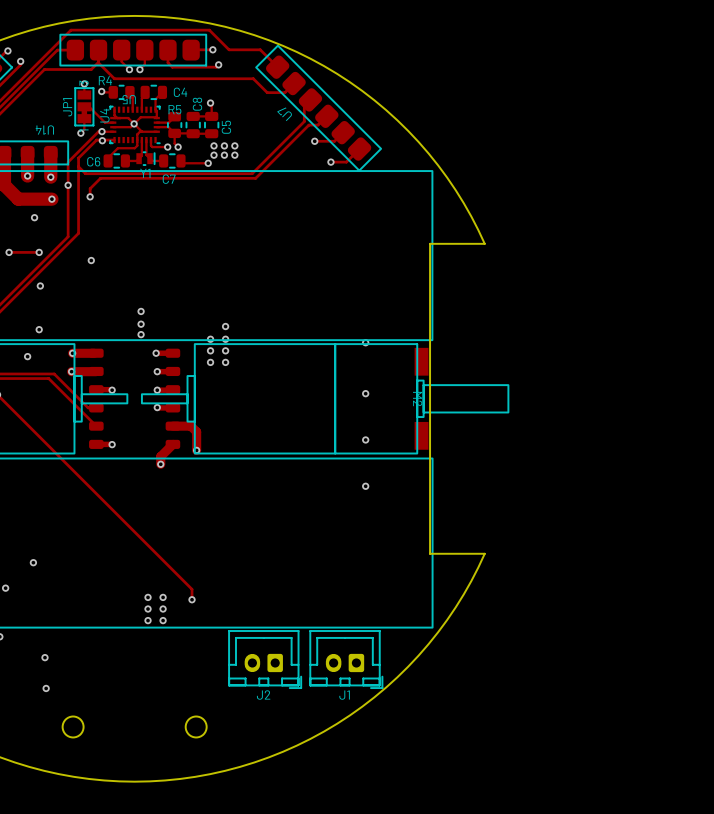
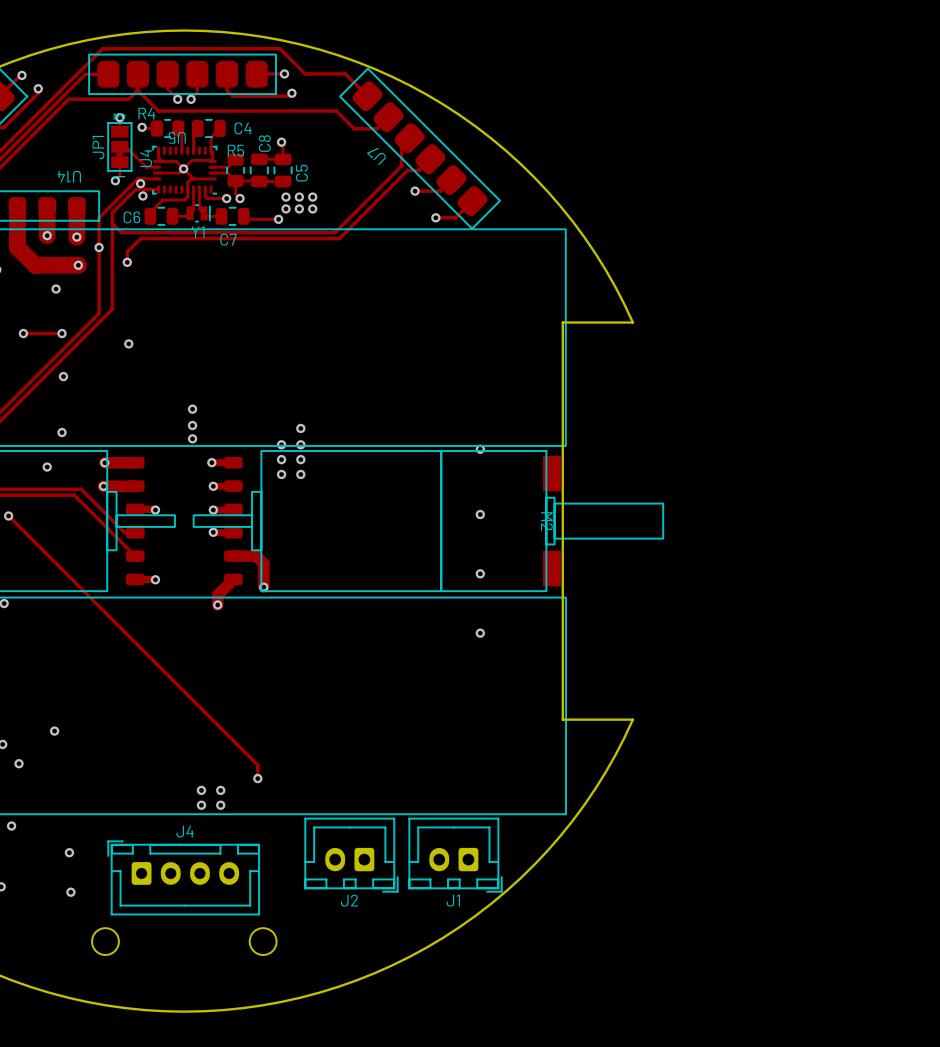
via: (101, 131) -> none
via: none -> (140, 183)
via: (102, 140) -> none
via: none -> (142, 195)
via: (148, 597) -> none
via: (163, 597) -> none
J4: none -> (183, 877)

